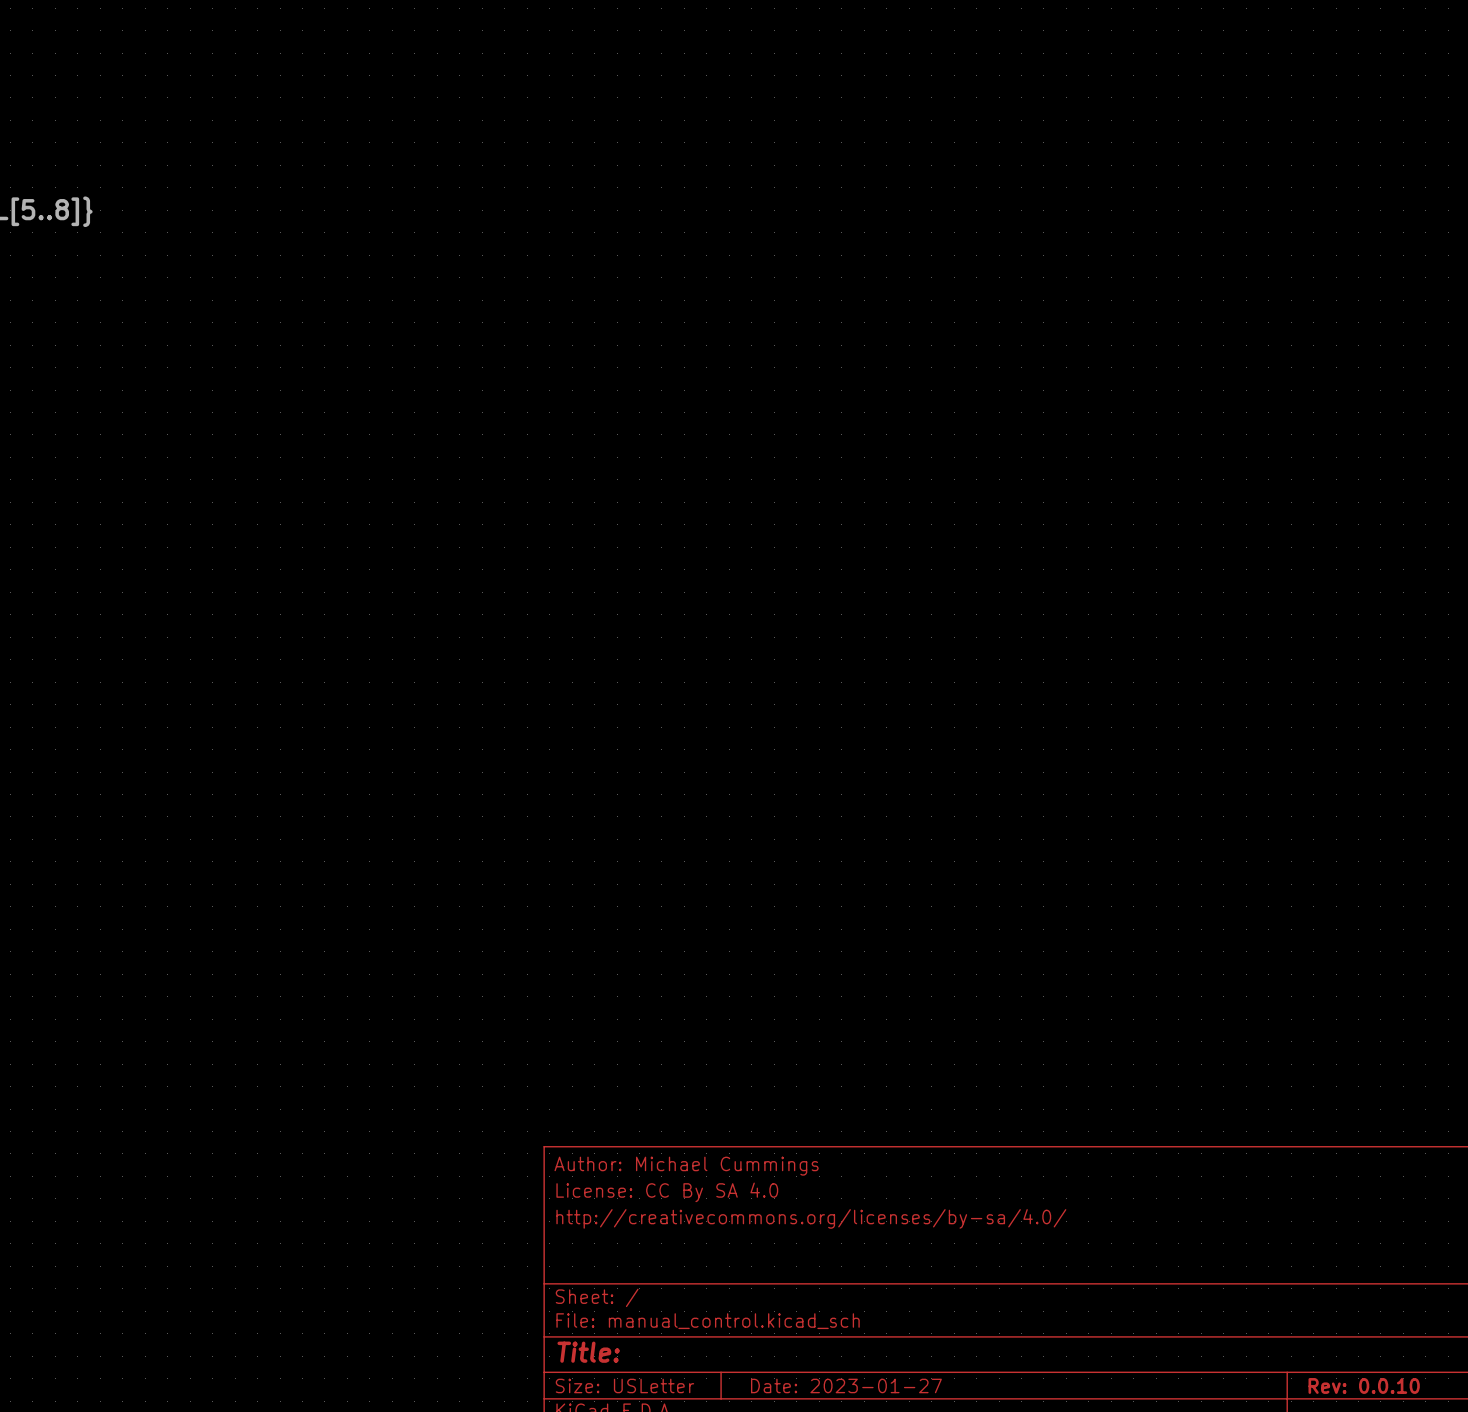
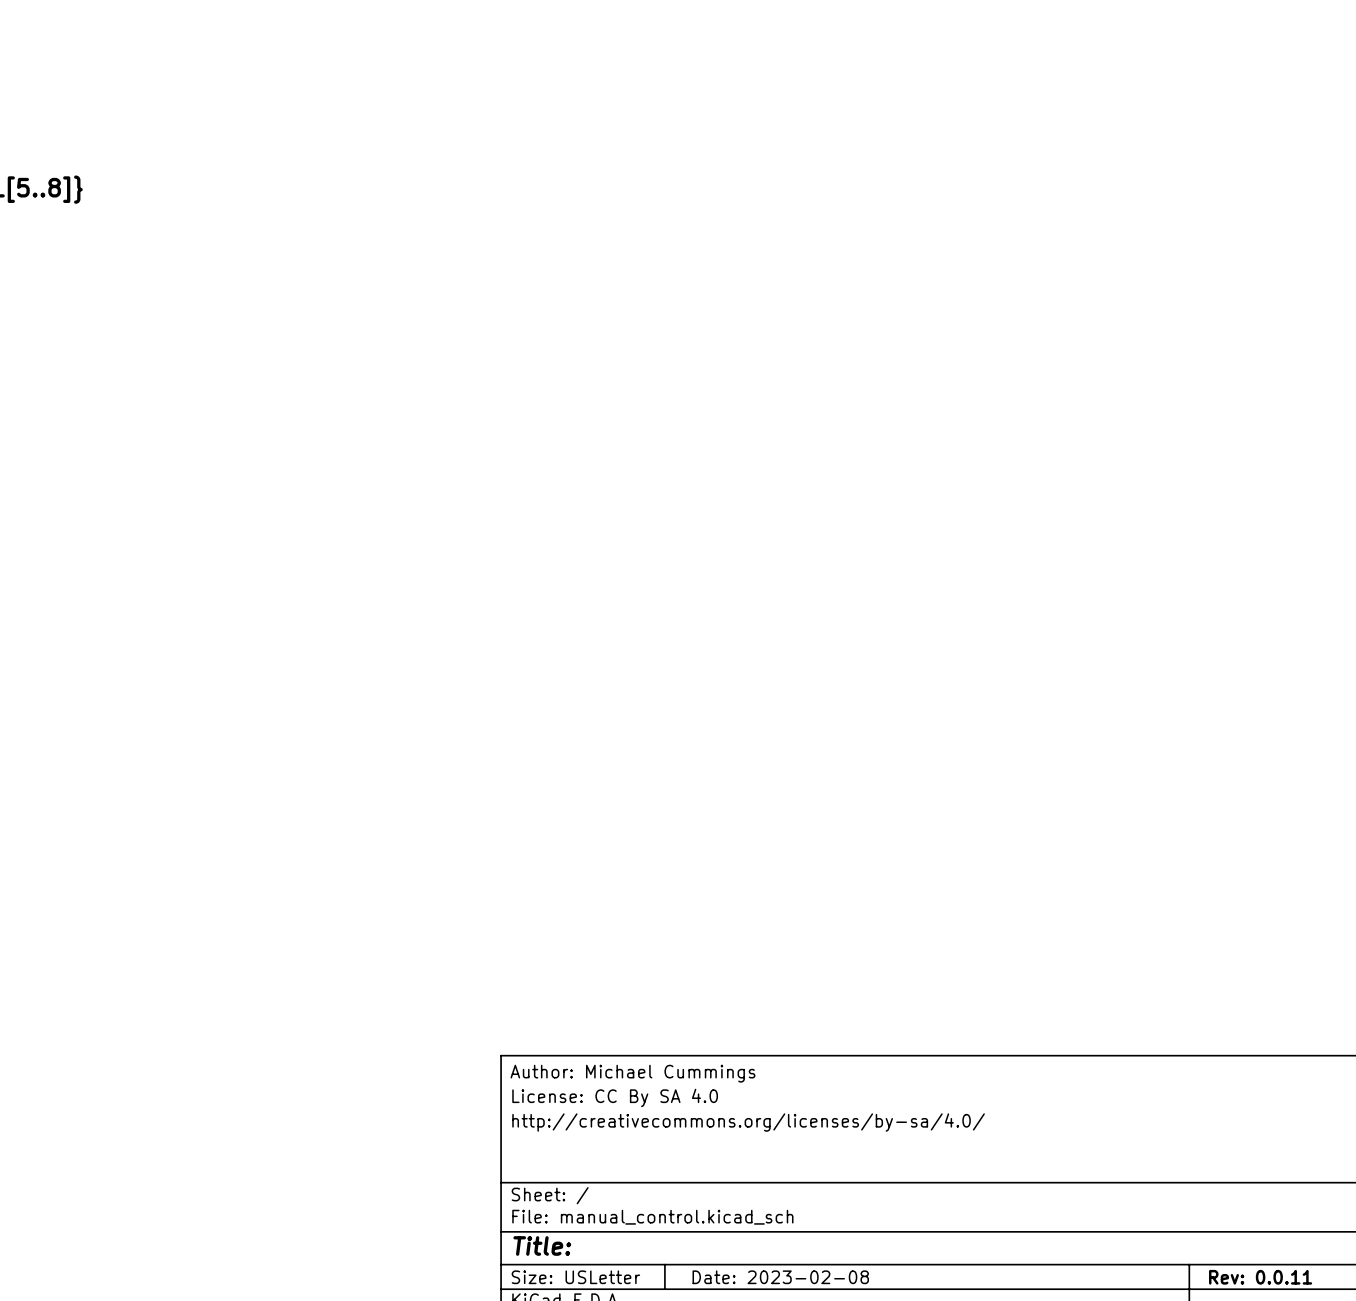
title block: Date: 2023-01-27 (846, 1385) -> Date: 2023-02-08 (780, 1277)
title block: Rev: 0.0.10 (1364, 1385) -> Rev: 0.0.11 (1260, 1277)

